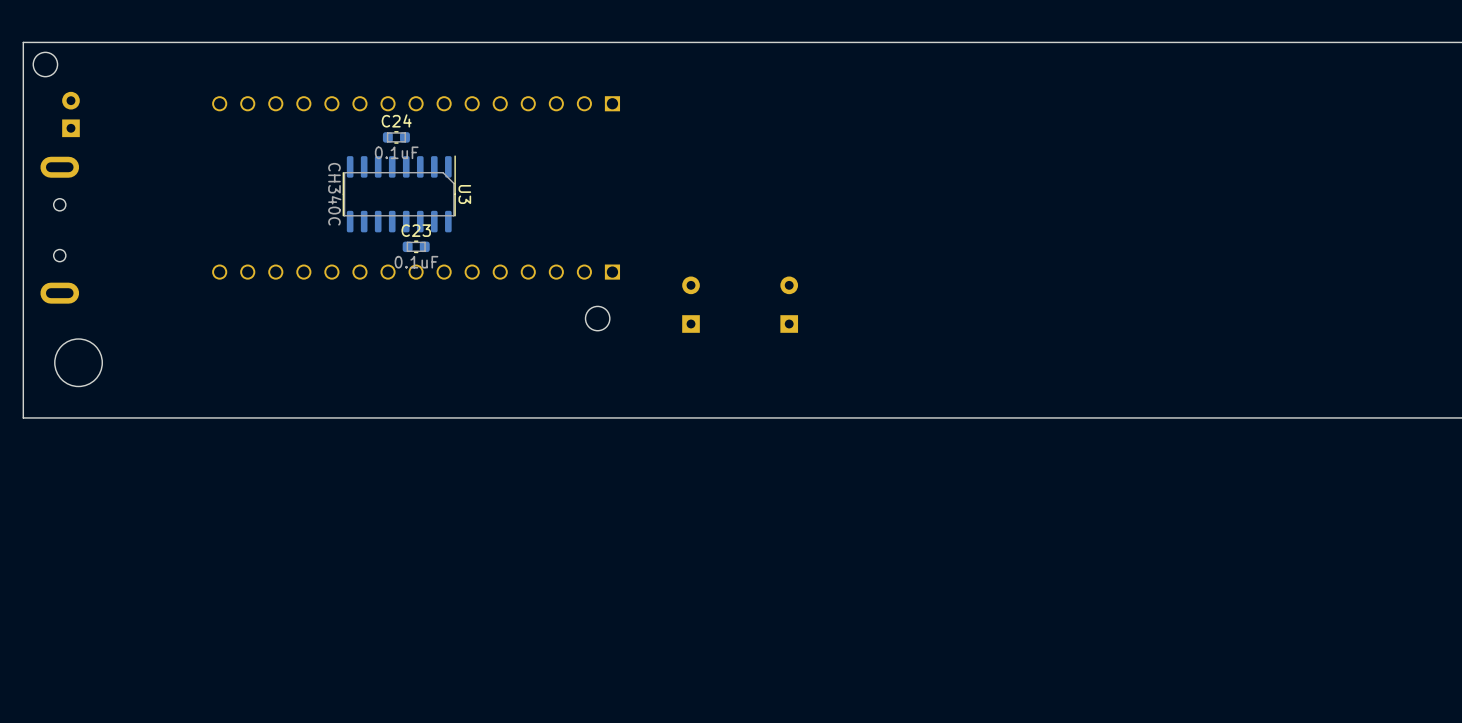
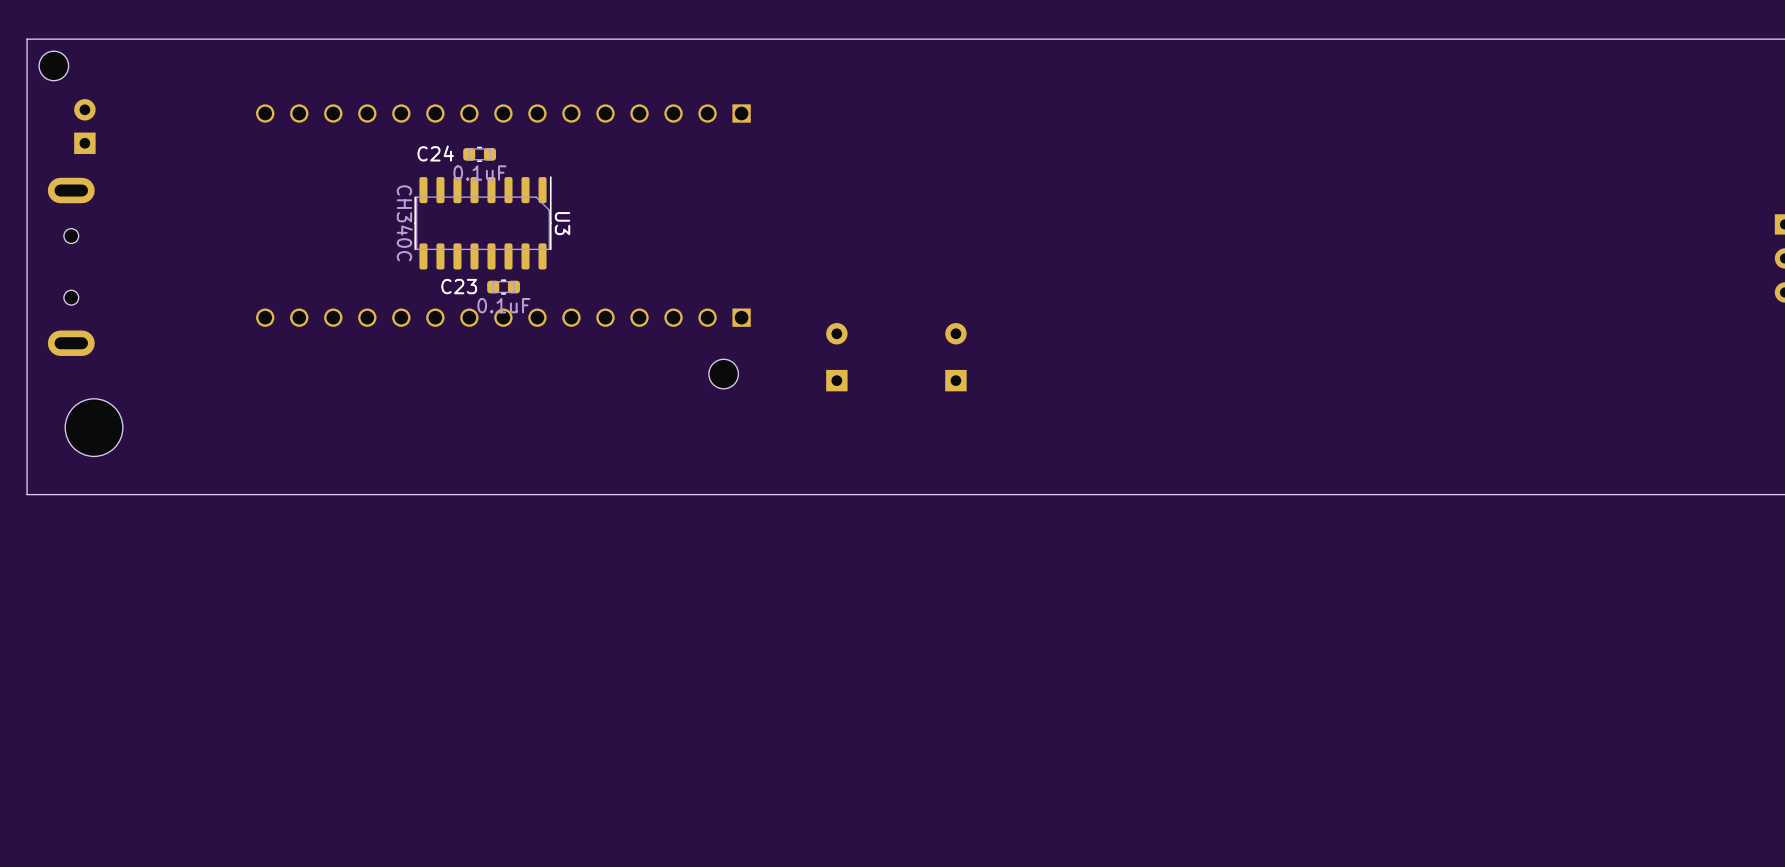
C24 name position: C24 (396, 120) -> C24 (435, 153)
C23 name position: C23 (416, 230) -> C23 (459, 286)

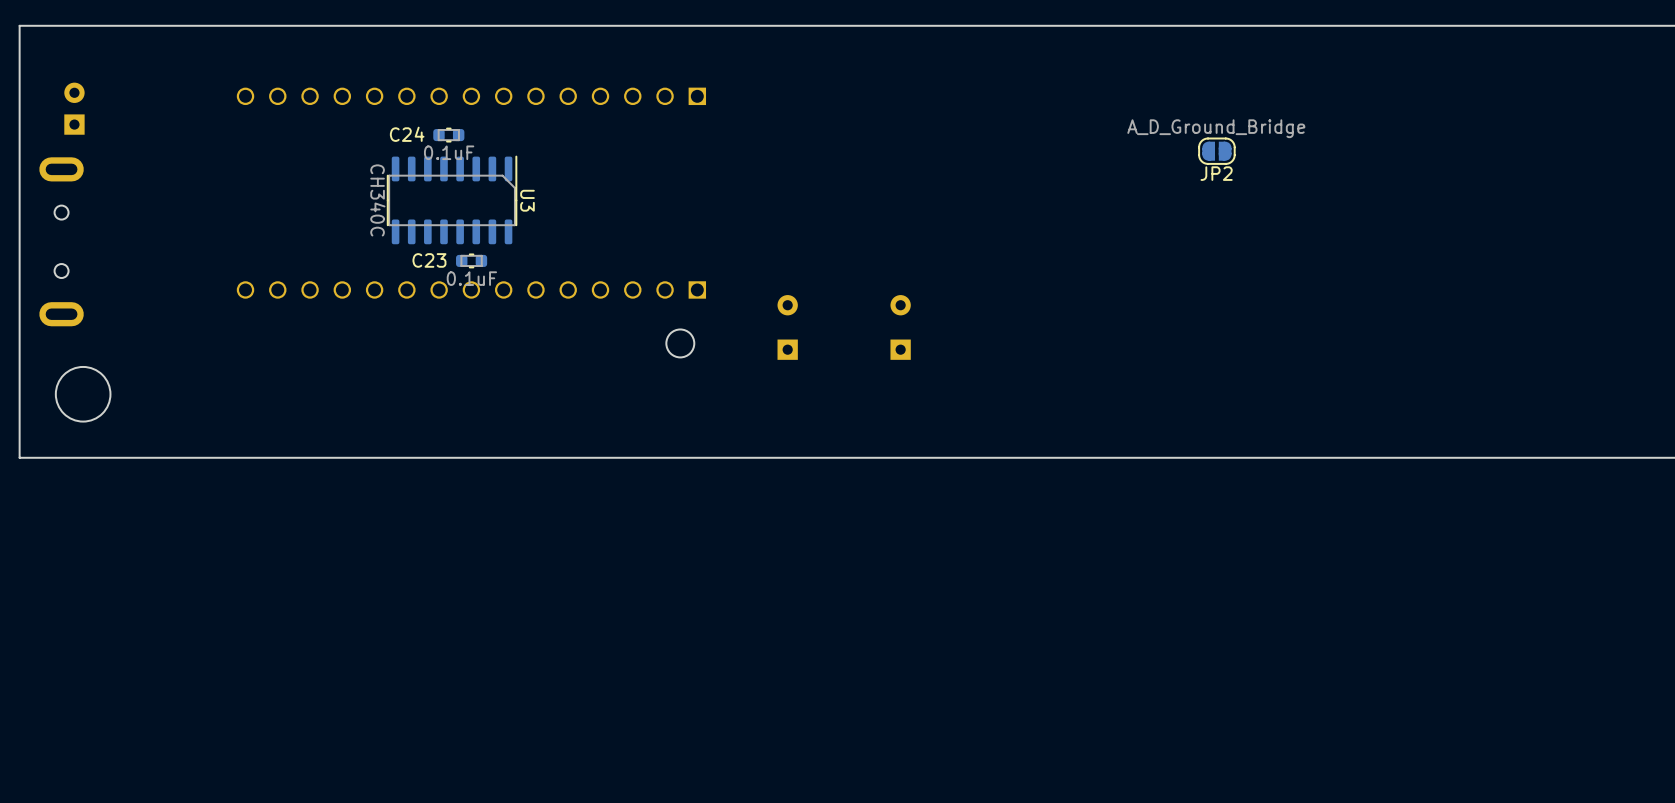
part: (53, 65) -> none
JP2: none -> A_D_Ground_Bridge (1216, 151)

